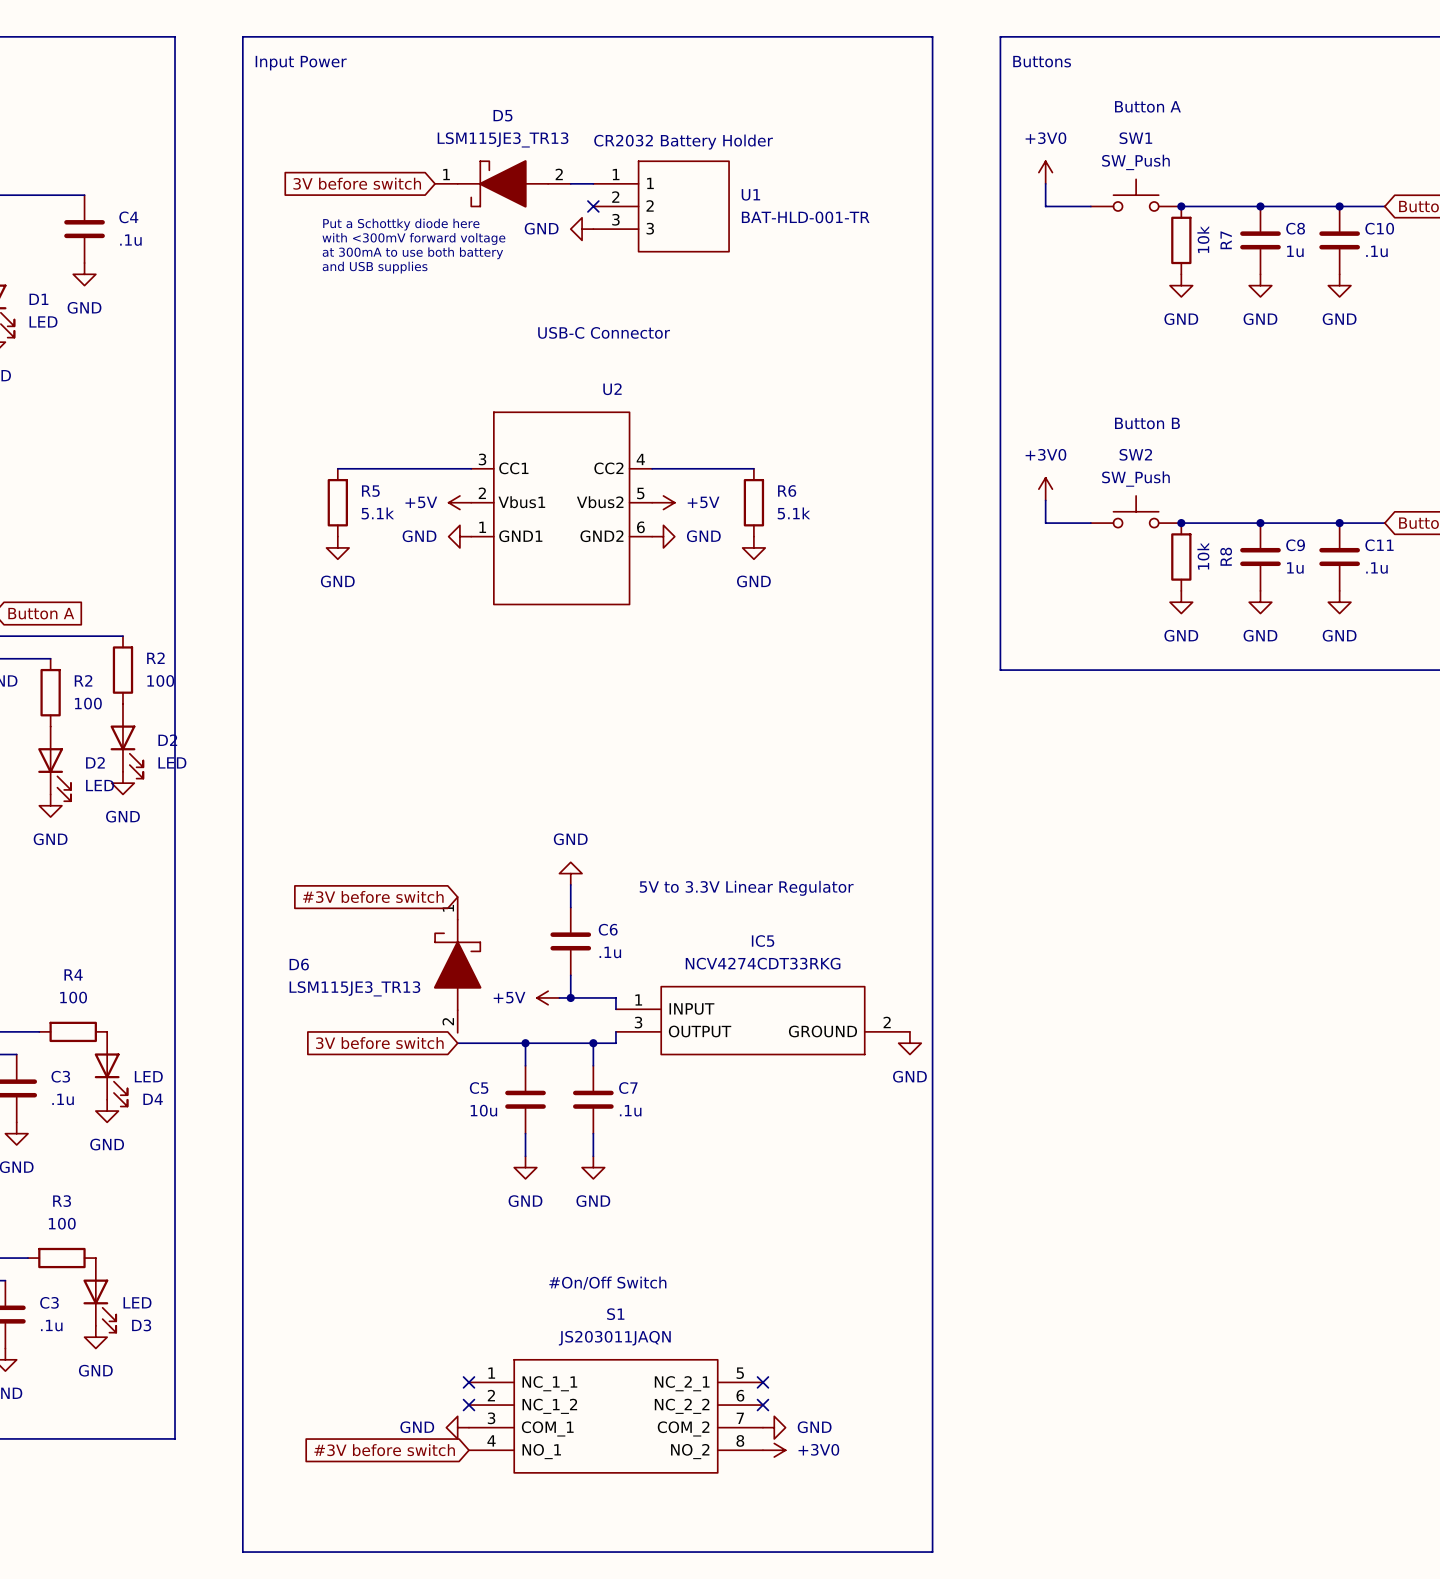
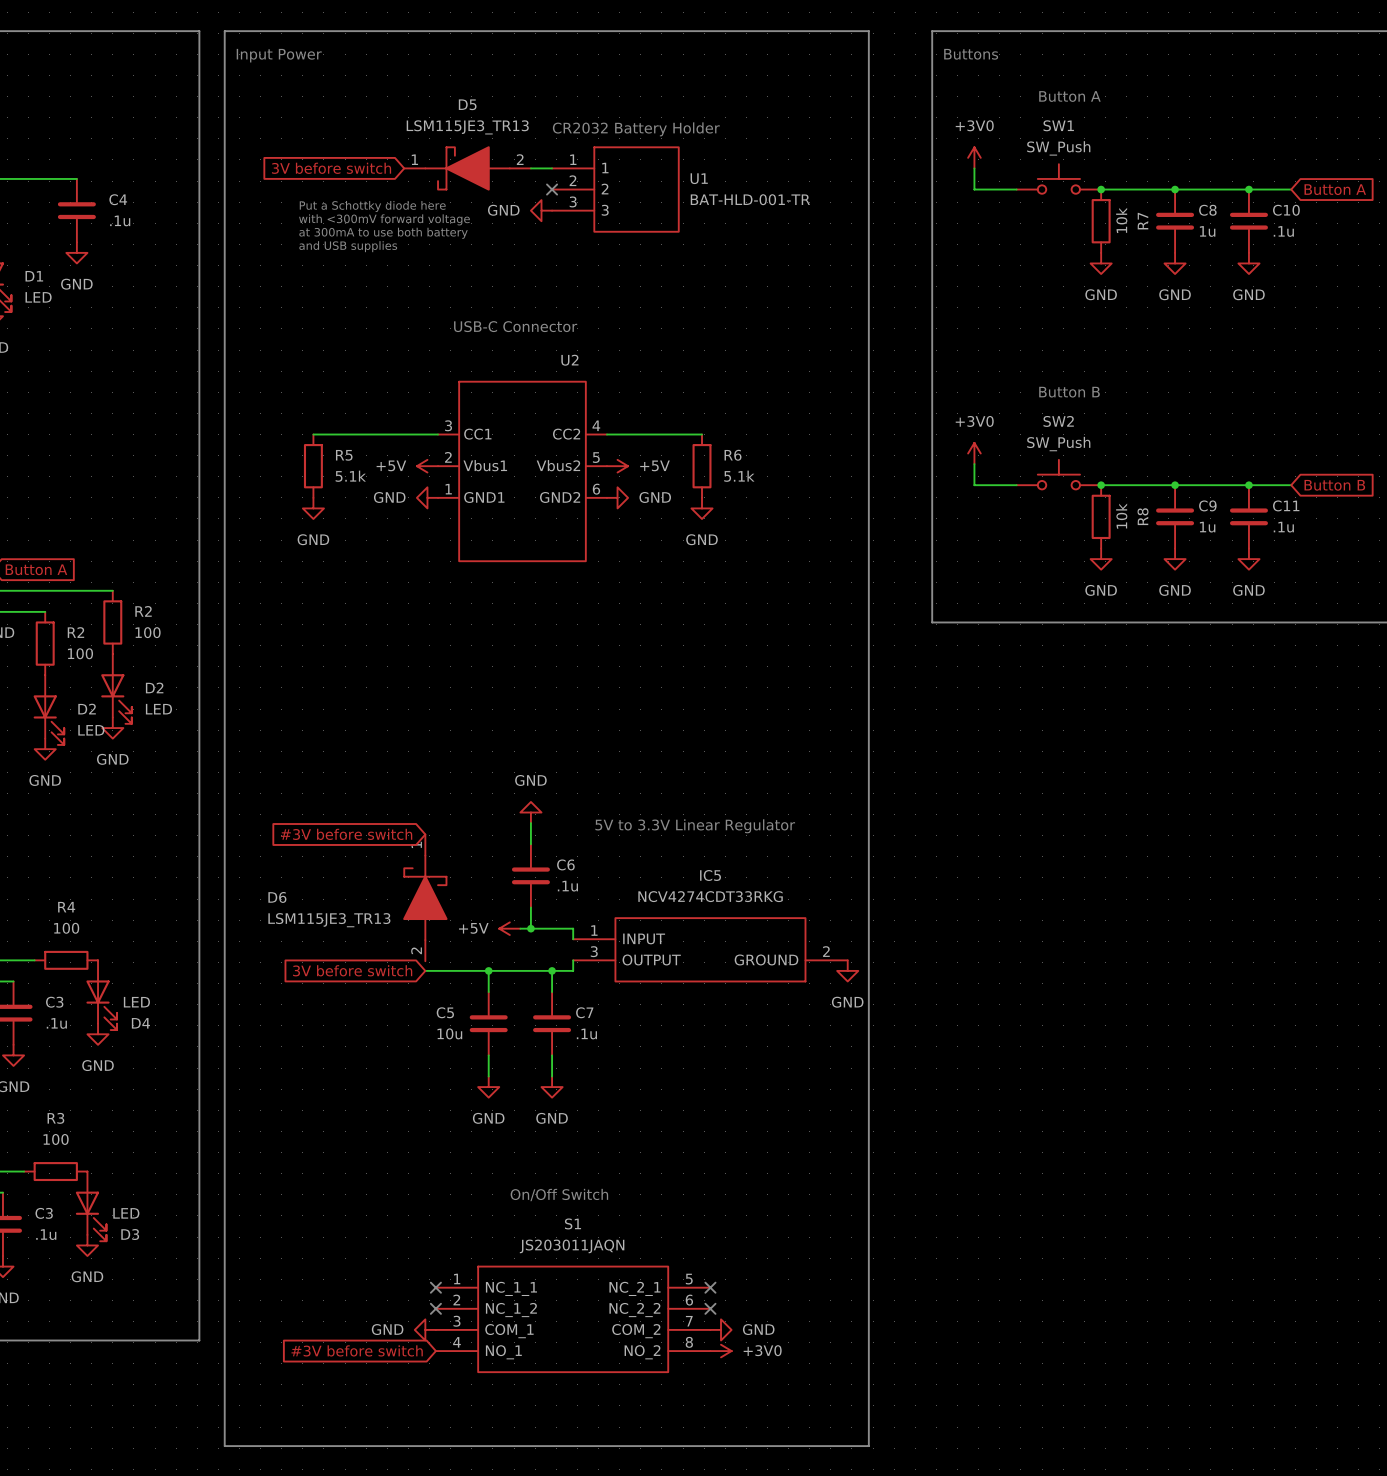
line: (175, 36) (175, 1438) -> (161, 31) (199, 31) (199, 1340) (161, 1340)
text position: USB-C Connector (604, 332) -> USB-C Connector (515, 326)
text: #On/Off Switch (607, 1283) -> On/Off Switch (559, 1195)

